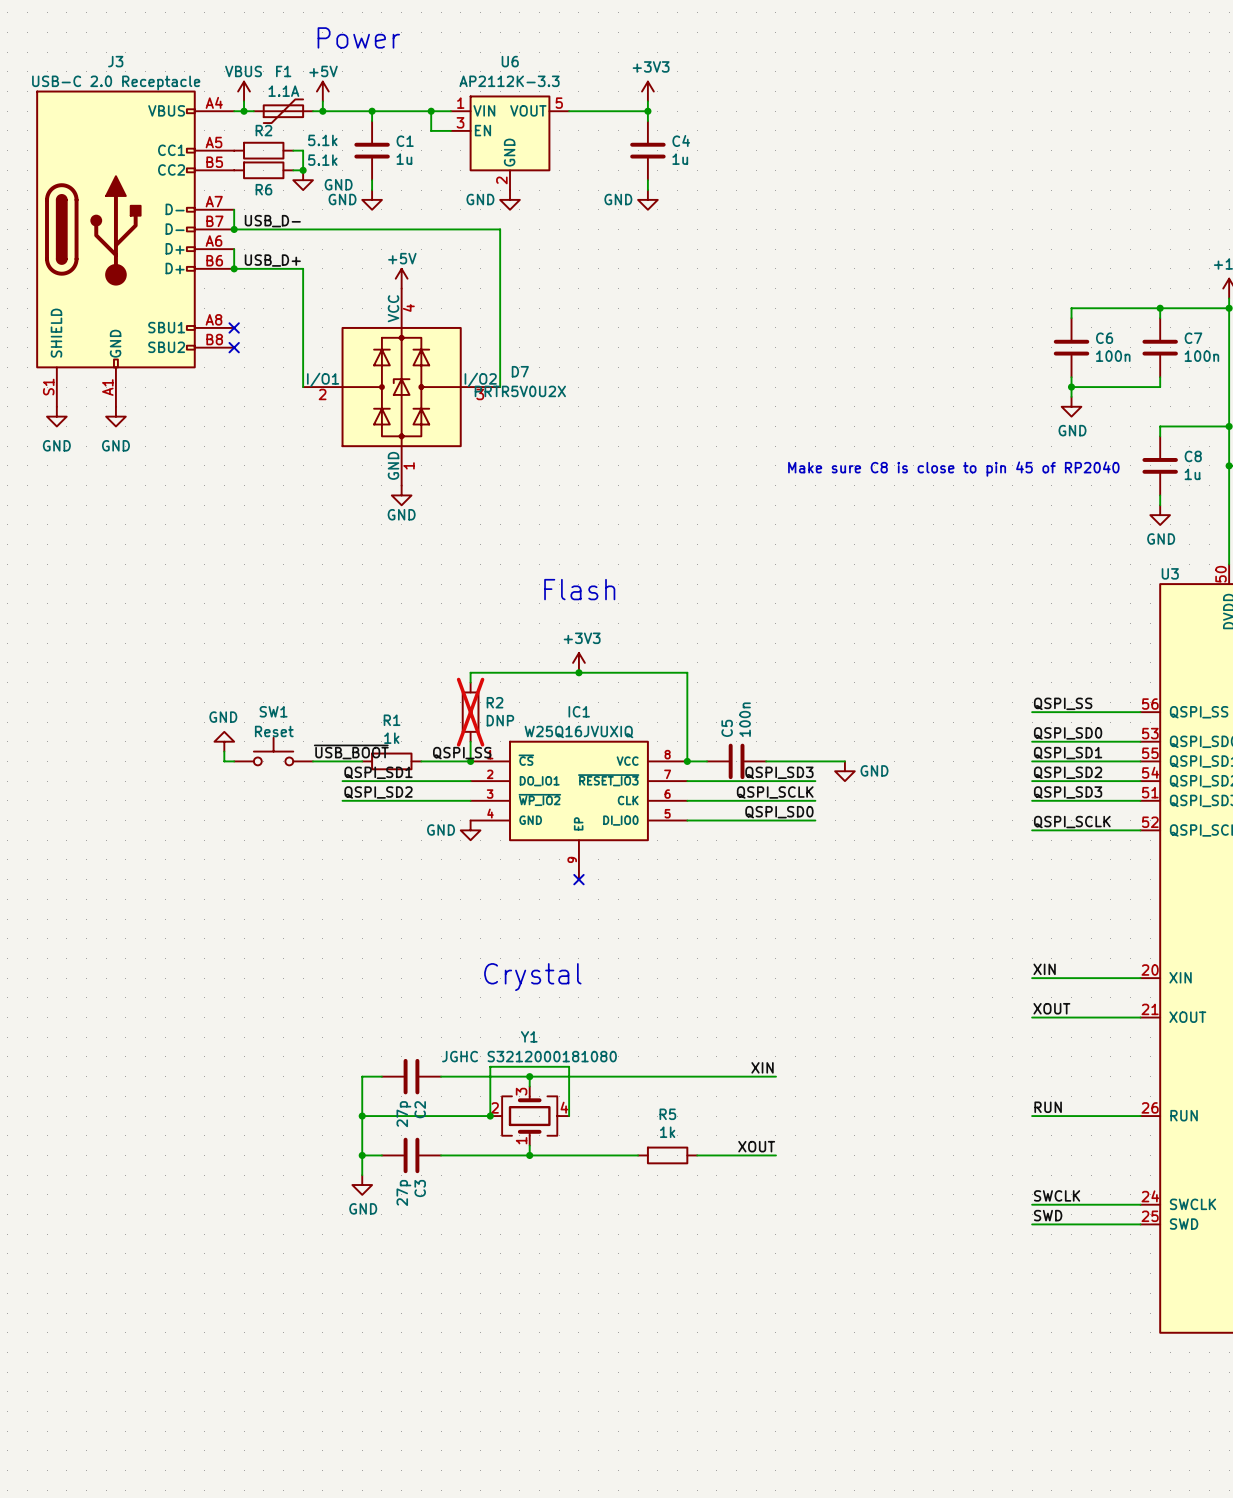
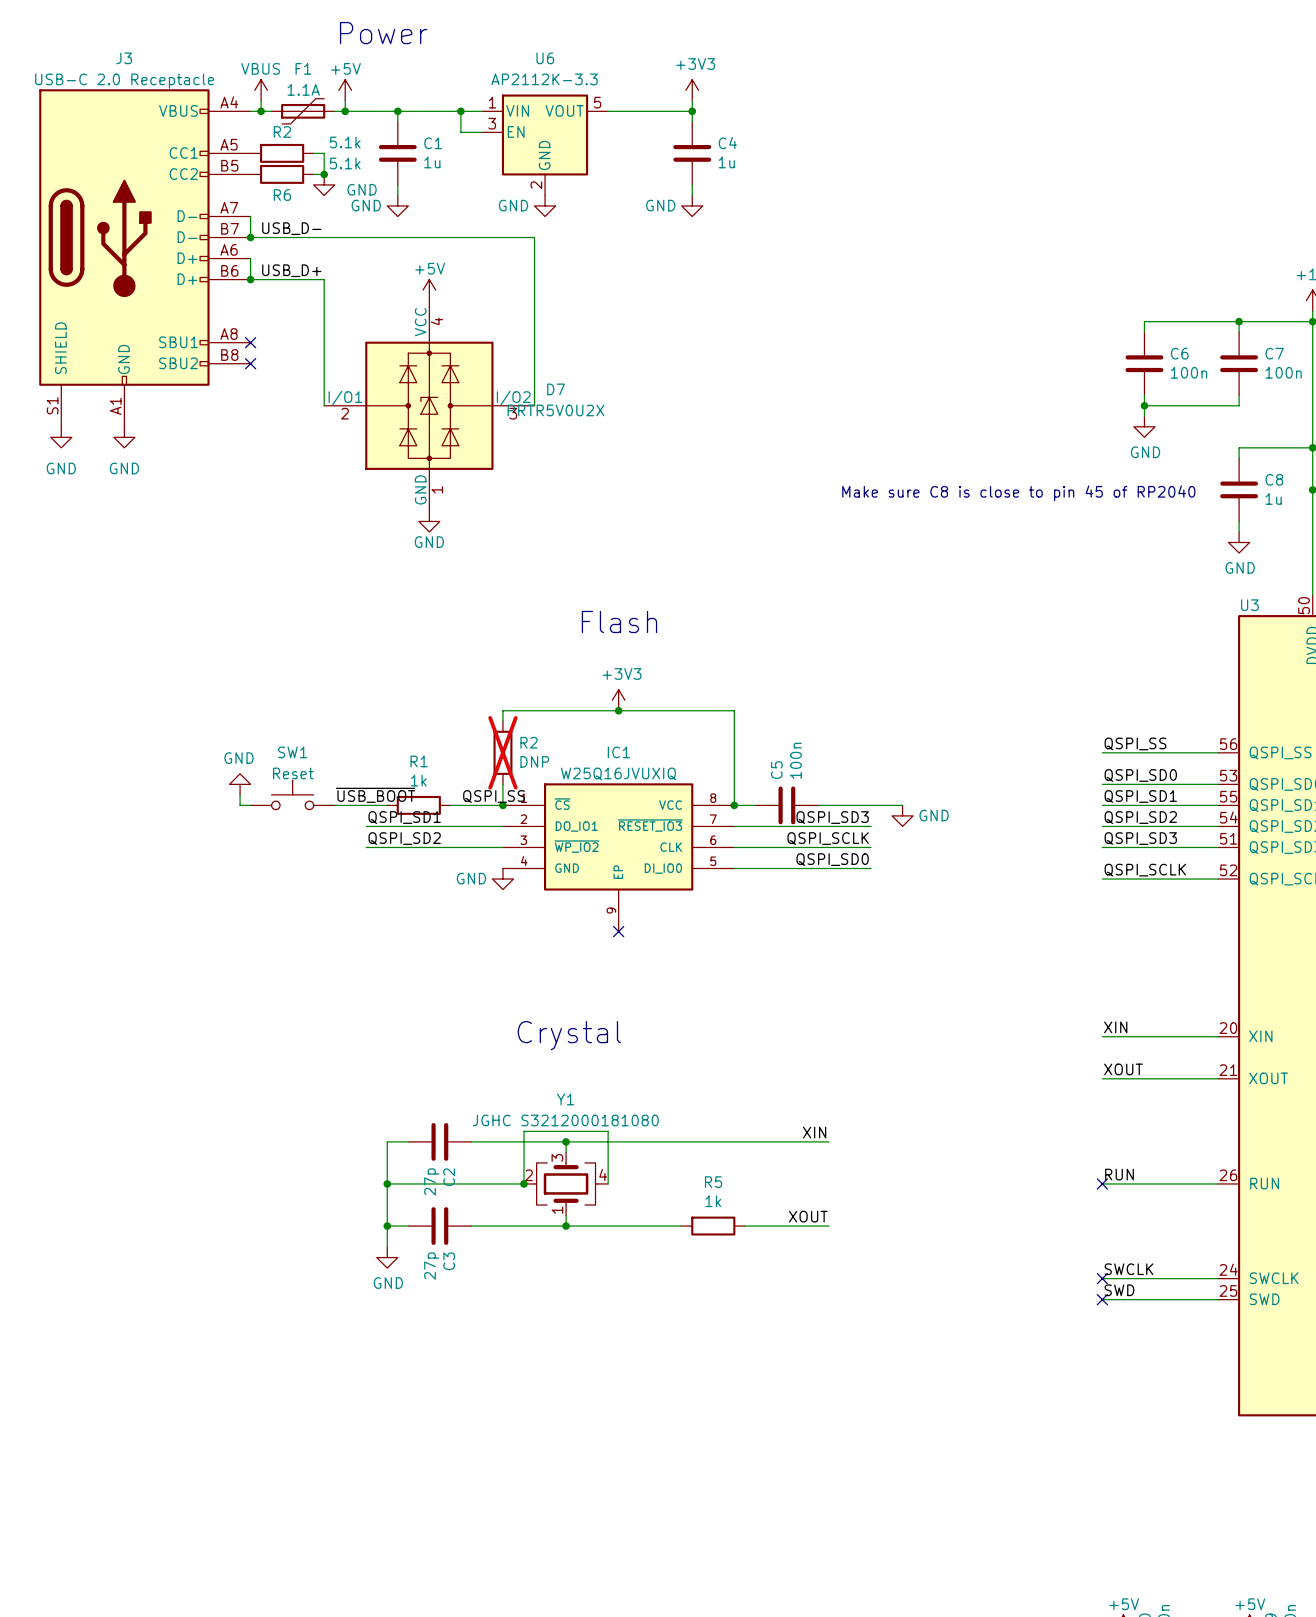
no-connect mark: none -> (1102, 1183)
no-connect mark: none -> (1102, 1278)
no-connect mark: none -> (1102, 1299)

